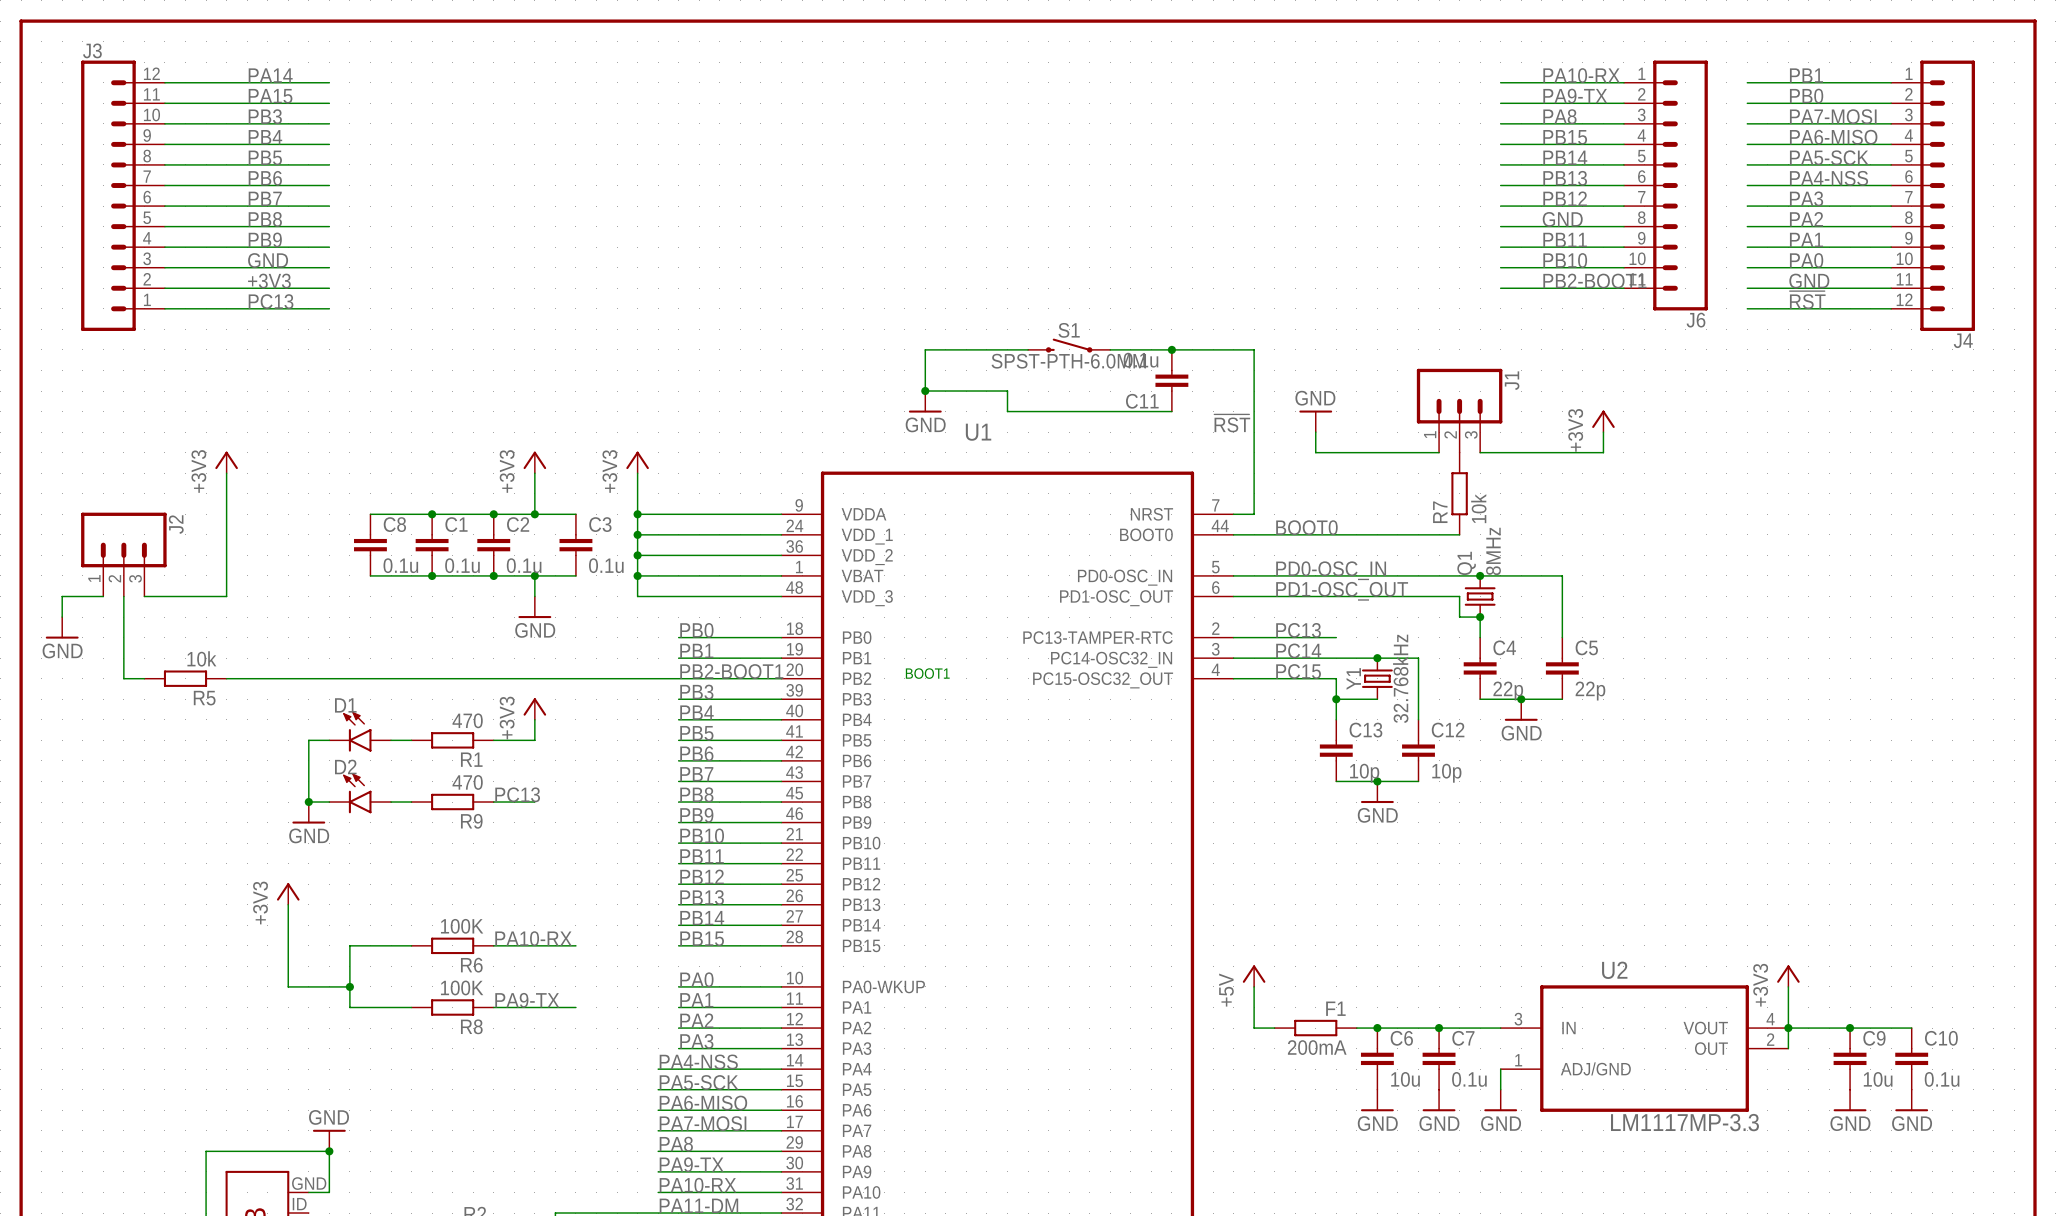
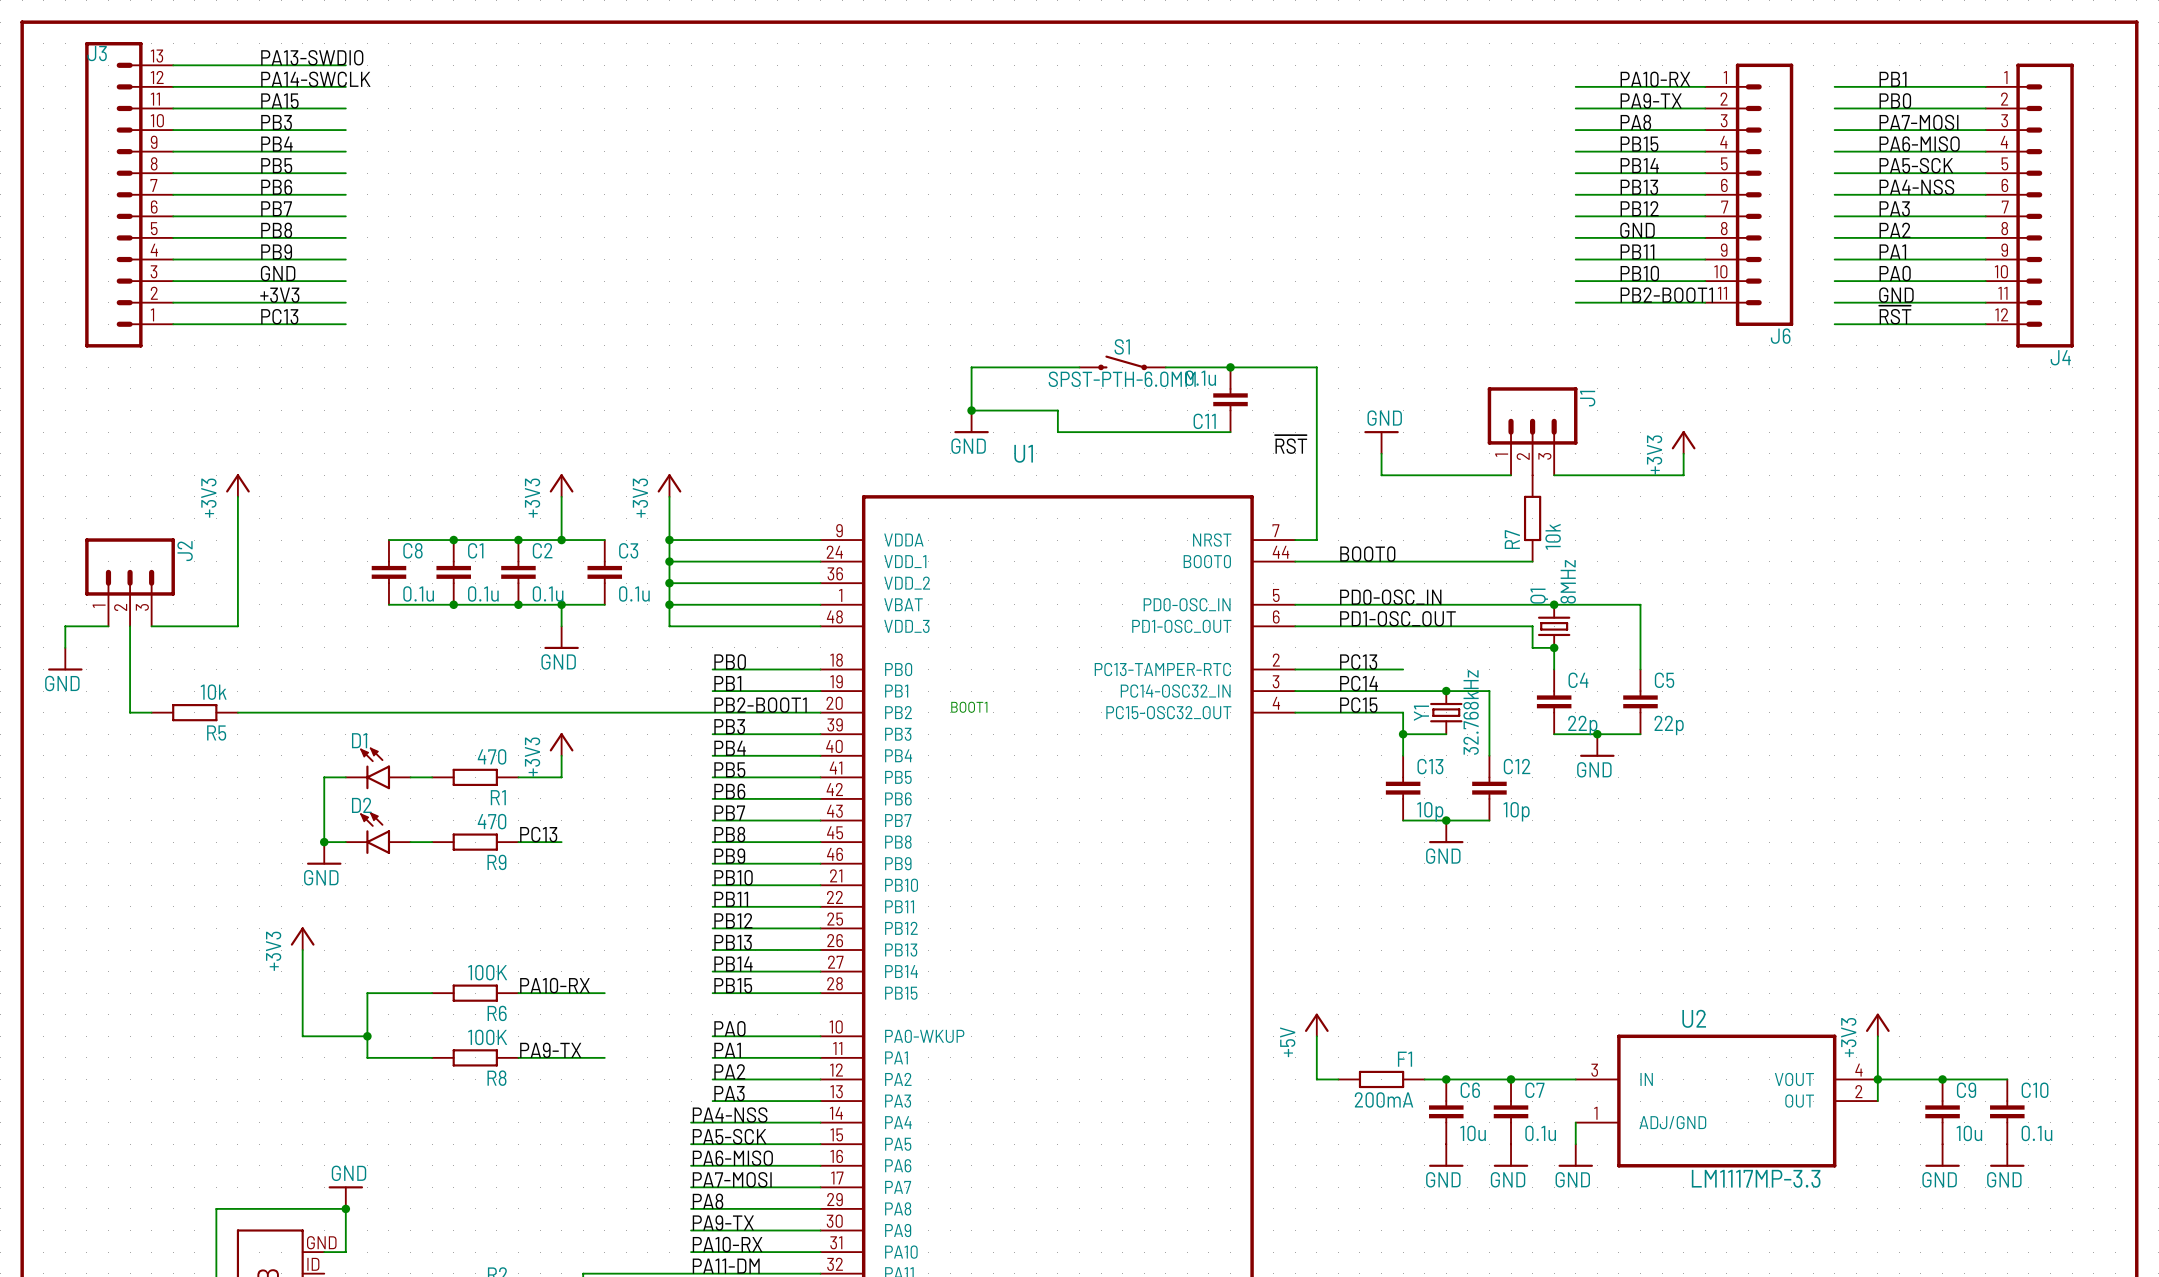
label: none -> PA13-SWDIO (312, 57)
J3 symbol: [81, 60, 165, 332] -> [85, 42, 174, 348]
wire: none -> (173, 65) (345, 65)
label: PA14 (270, 75) -> PA14-SWCLK (315, 79)

